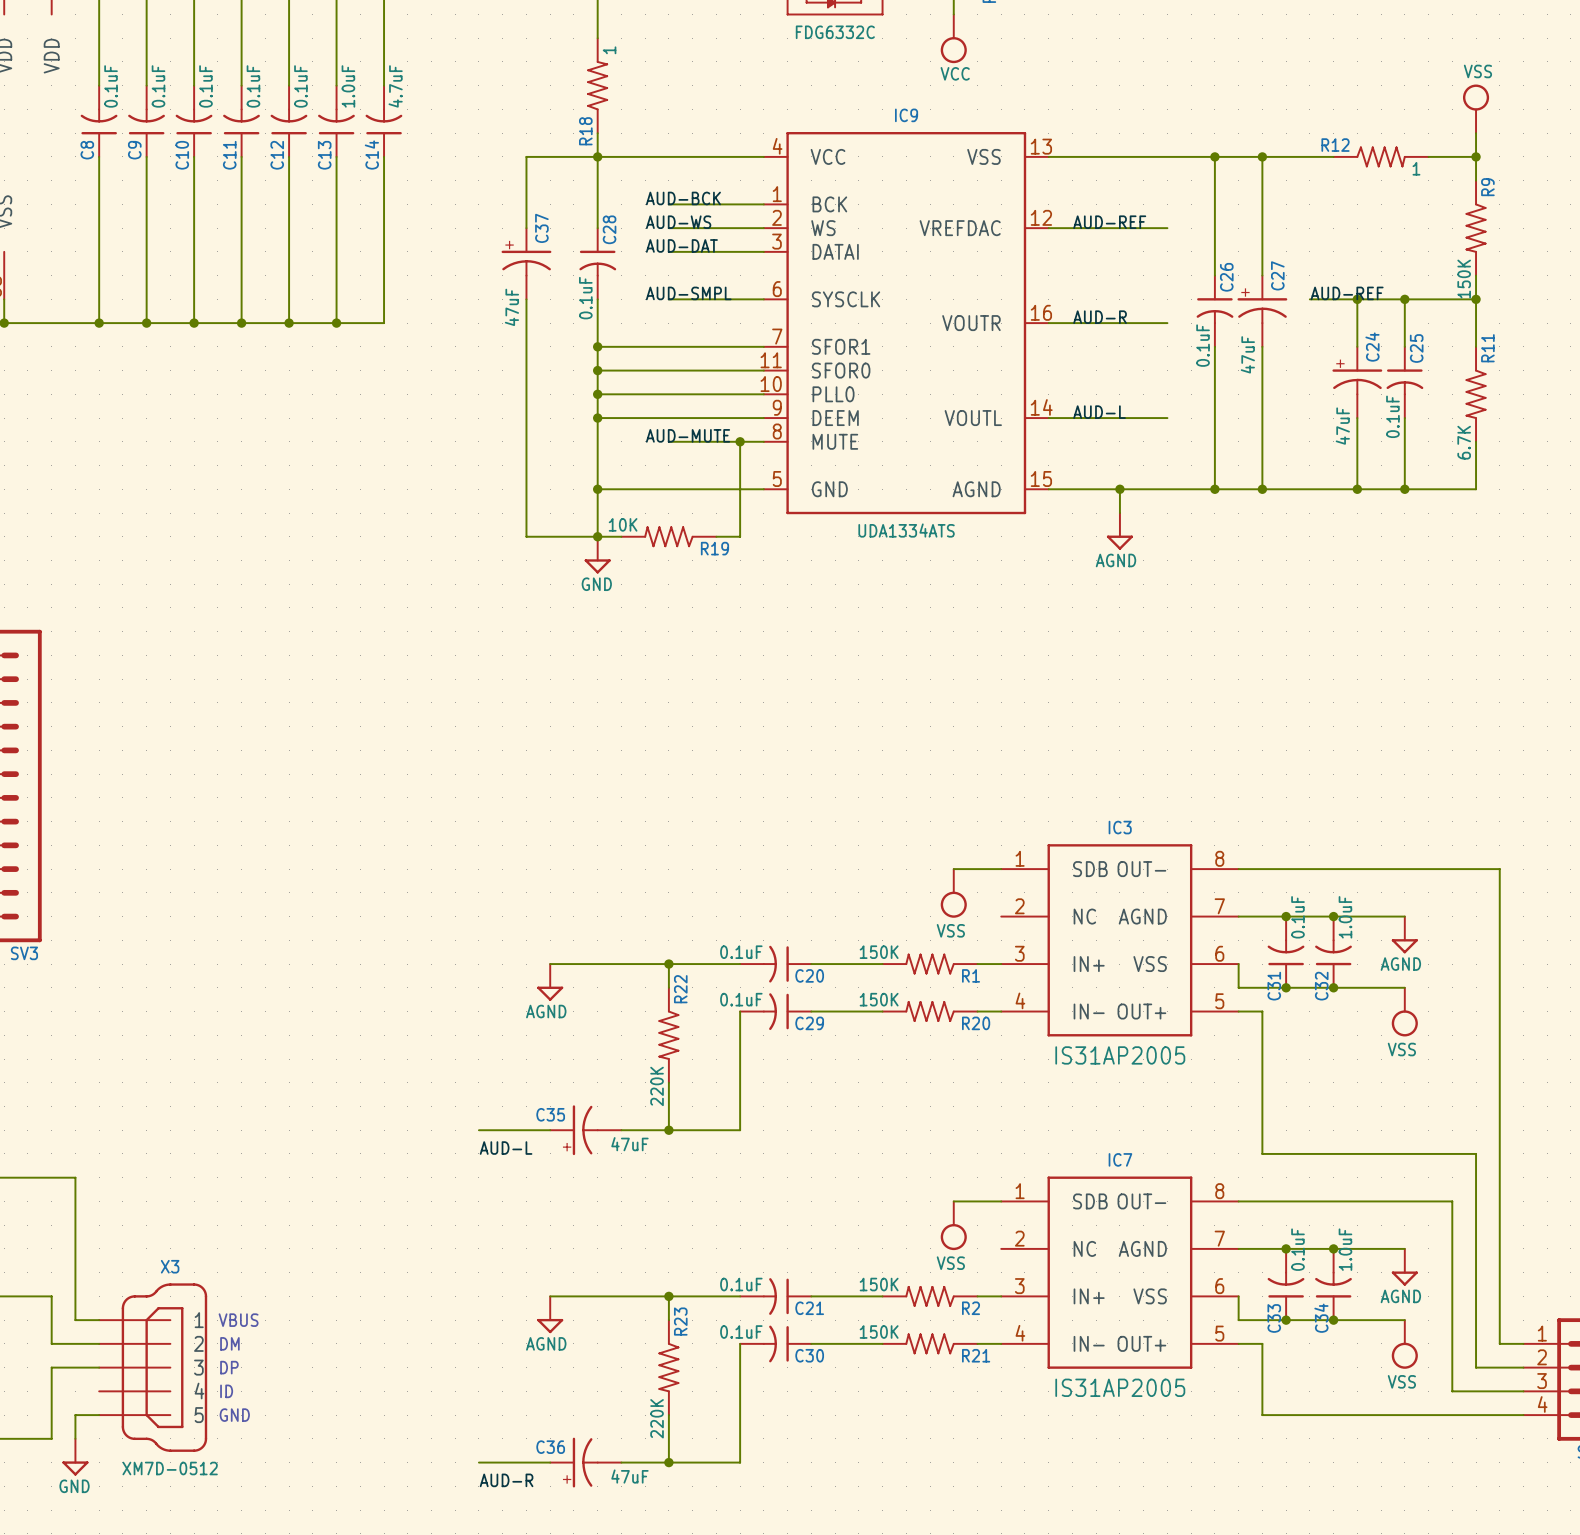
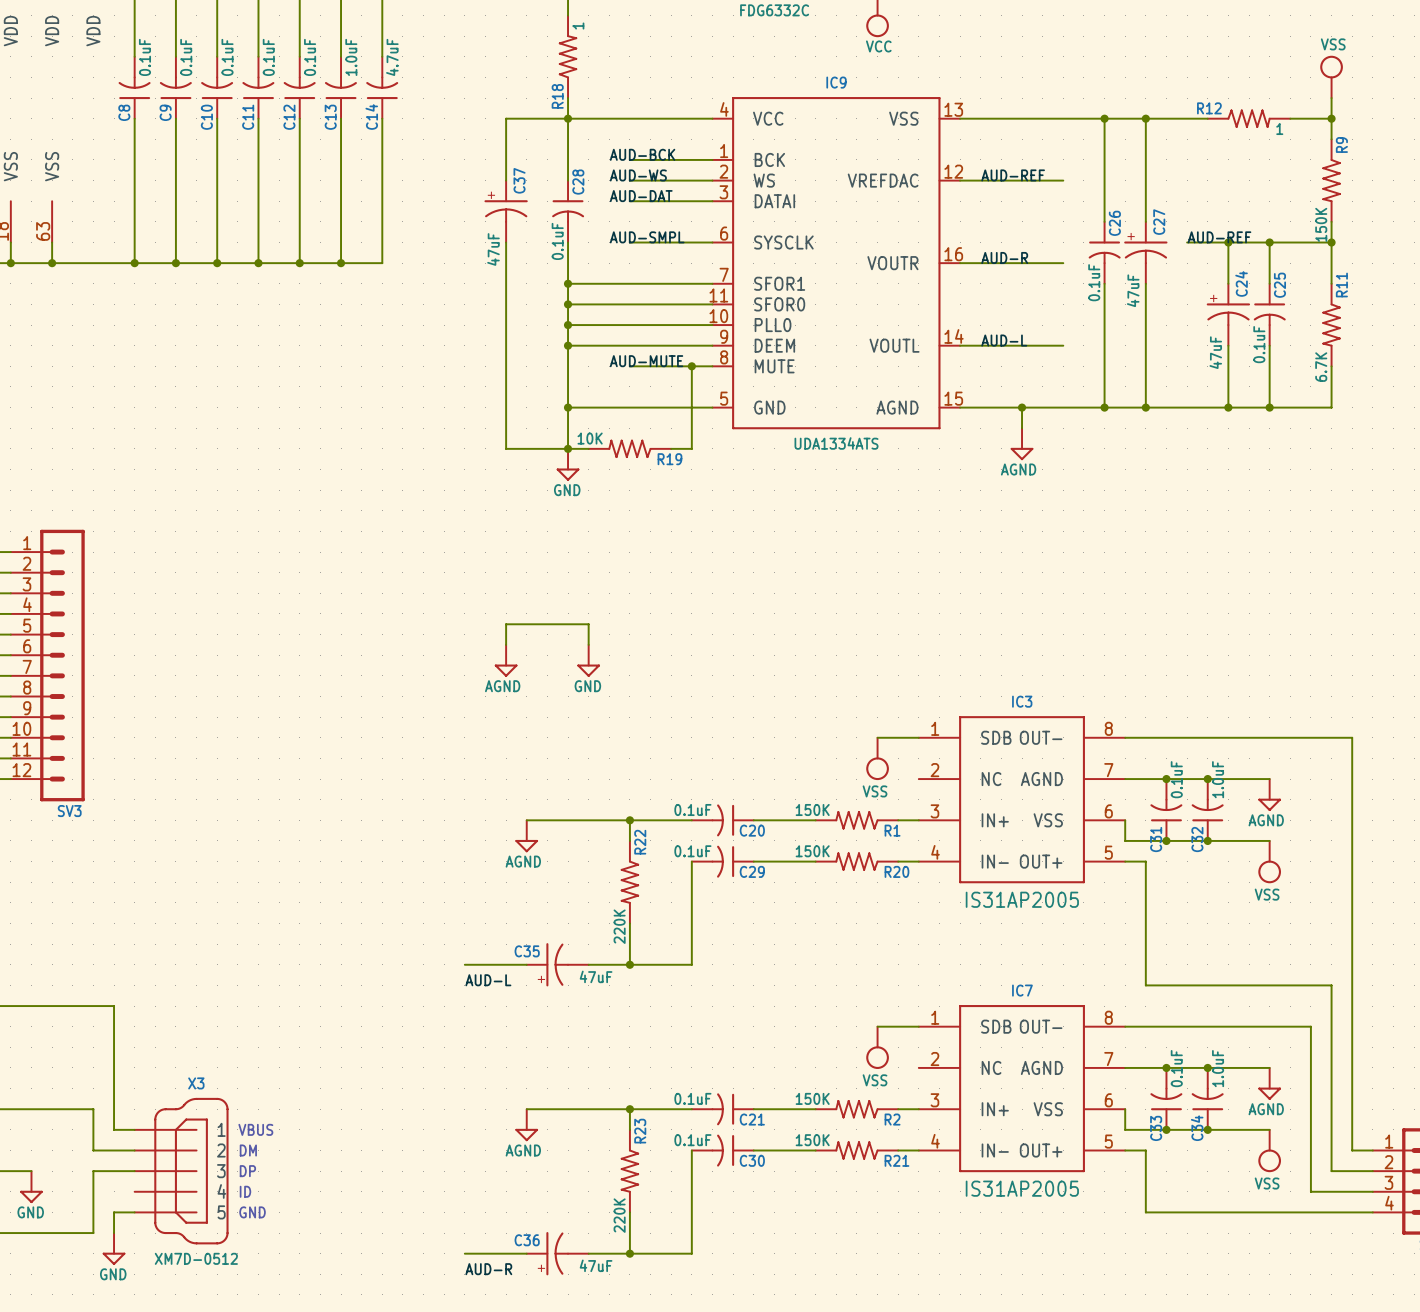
wire: none -> (506, 644) (506, 624) (588, 624) (588, 644)
power symbol: none -> AGND (506, 660)
power symbol: none -> GND (588, 660)

